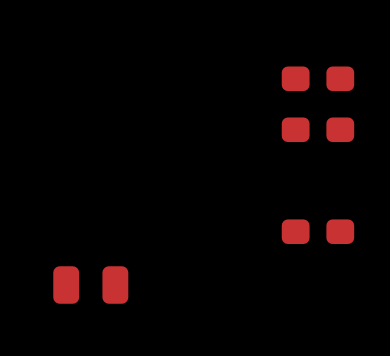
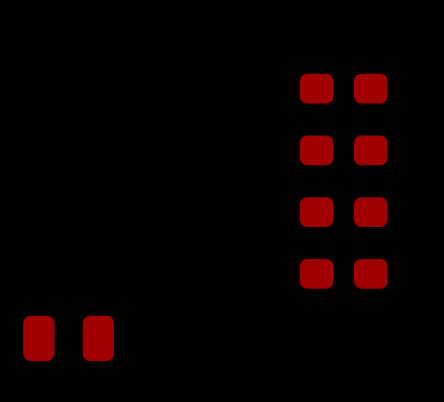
part: none -> (343, 212)

